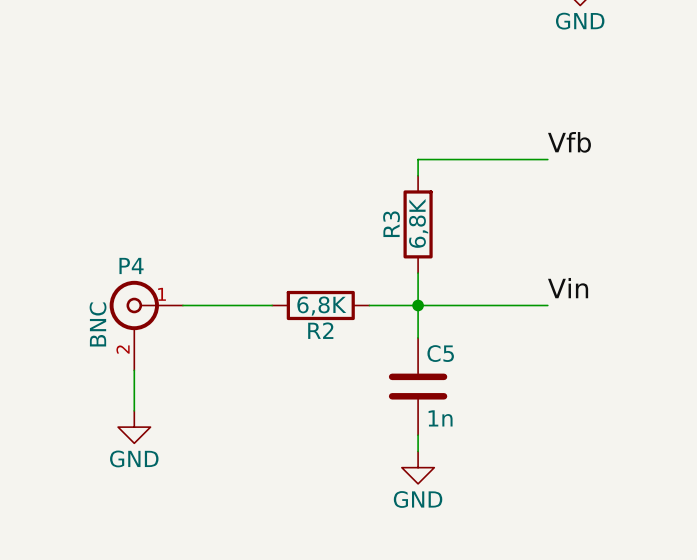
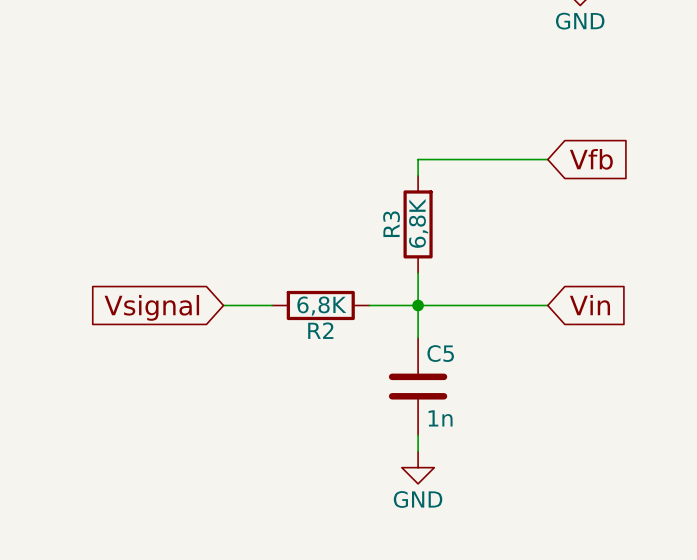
label: Vfb (569, 142) -> none
global label: none -> Vfb (591, 159)
label: Vin (568, 288) -> none
wire: (182, 305) (223, 305) -> none
global label: none -> Vin (589, 305)
global label: none -> Vsignal (151, 307)
P4: BNC (146, 325) -> none
wire: (134, 370) (134, 410) -> none
power symbol: GND (134, 427) -> none

